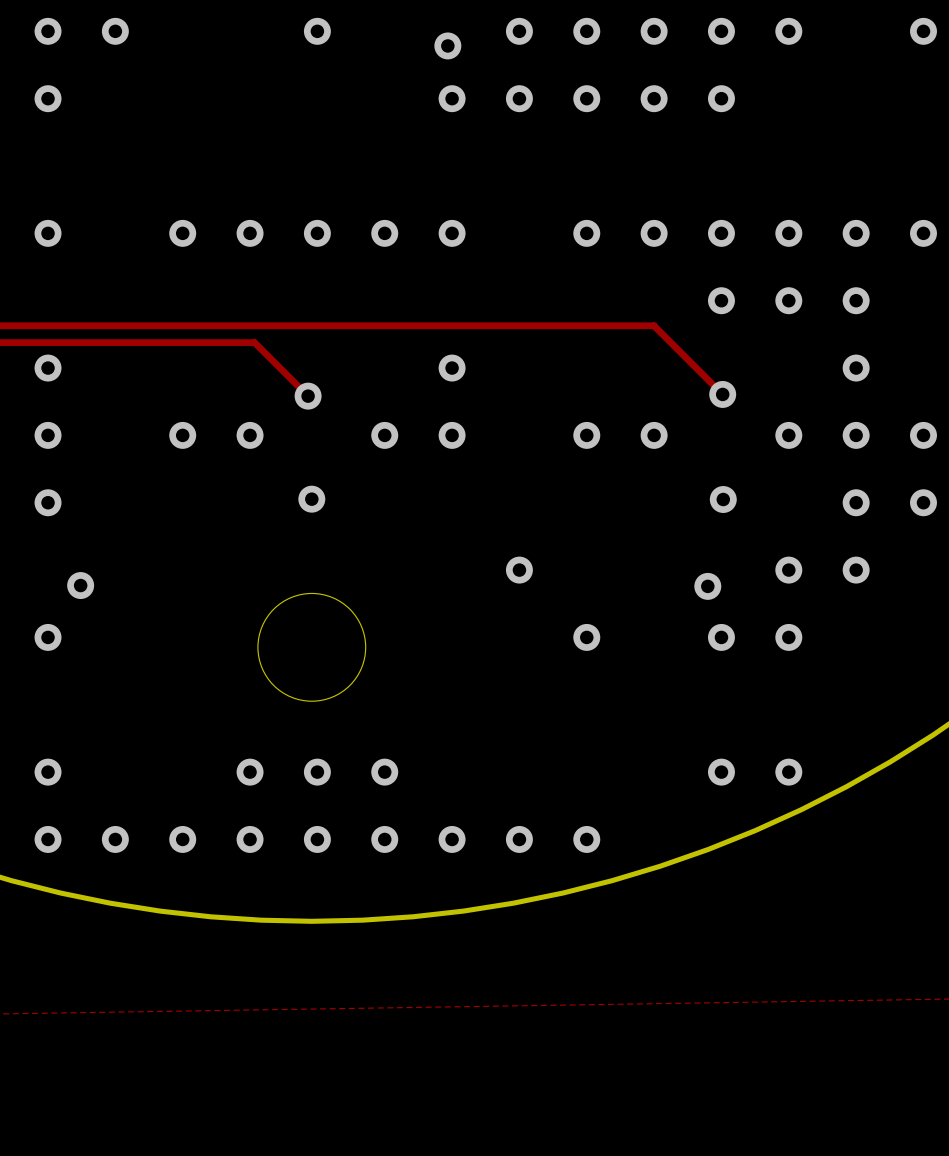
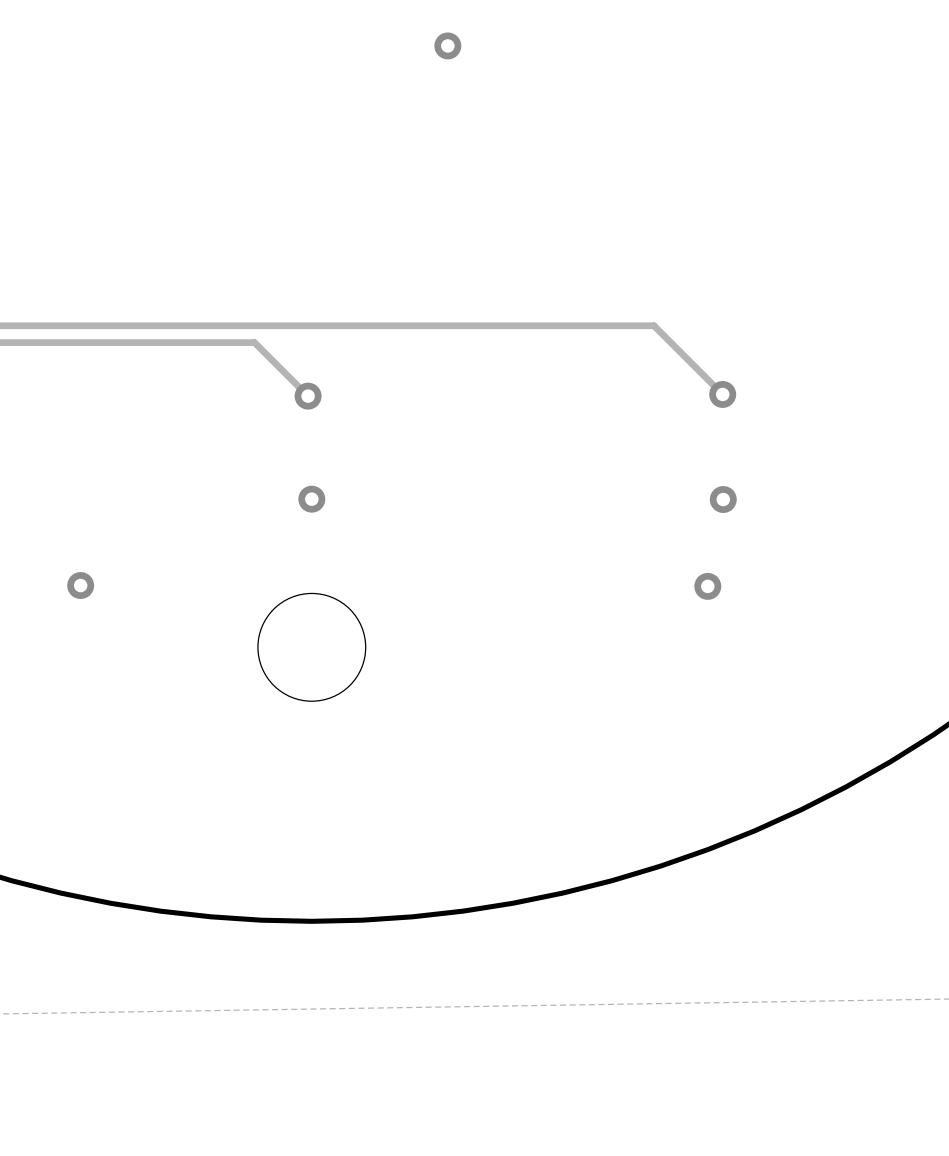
via: (48, 31) -> none
via: (115, 31) -> none
via: (317, 31) -> none
via: (519, 31) -> none
via: (586, 31) -> none
via: (654, 31) -> none
via: (721, 31) -> none
via: (788, 31) -> none
via: (923, 31) -> none
via: (48, 98) -> none
via: (452, 98) -> none
via: (519, 98) -> none
via: (586, 98) -> none
via: (654, 98) -> none
via: (721, 98) -> none
via: (48, 233) -> none
via: (182, 233) -> none
via: (250, 233) -> none
via: (317, 233) -> none
via: (384, 233) -> none
via: (452, 233) -> none
via: (586, 233) -> none
via: (654, 233) -> none
via: (721, 233) -> none
via: (788, 233) -> none
via: (856, 233) -> none
via: (923, 233) -> none
via: (721, 300) -> none
via: (788, 300) -> none
via: (856, 300) -> none
via: (48, 368) -> none
via: (452, 368) -> none
via: (856, 368) -> none
via: (48, 435) -> none
via: (182, 435) -> none
via: (250, 435) -> none
via: (384, 435) -> none
via: (452, 435) -> none
via: (586, 435) -> none
via: (654, 435) -> none
via: (788, 435) -> none
via: (856, 435) -> none
via: (923, 435) -> none
via: (48, 502) -> none
via: (856, 502) -> none
via: (923, 502) -> none
via: (519, 570) -> none
via: (788, 570) -> none
via: (856, 570) -> none
via: (48, 637) -> none
via: (586, 637) -> none
via: (721, 637) -> none
via: (788, 637) -> none
via: (48, 772) -> none
via: (250, 772) -> none
via: (317, 772) -> none
via: (384, 772) -> none
via: (721, 772) -> none
via: (788, 772) -> none
via: (48, 839) -> none
via: (115, 839) -> none
via: (182, 839) -> none
via: (250, 839) -> none
via: (317, 839) -> none
via: (384, 839) -> none
via: (452, 839) -> none
via: (519, 839) -> none
via: (586, 839) -> none

